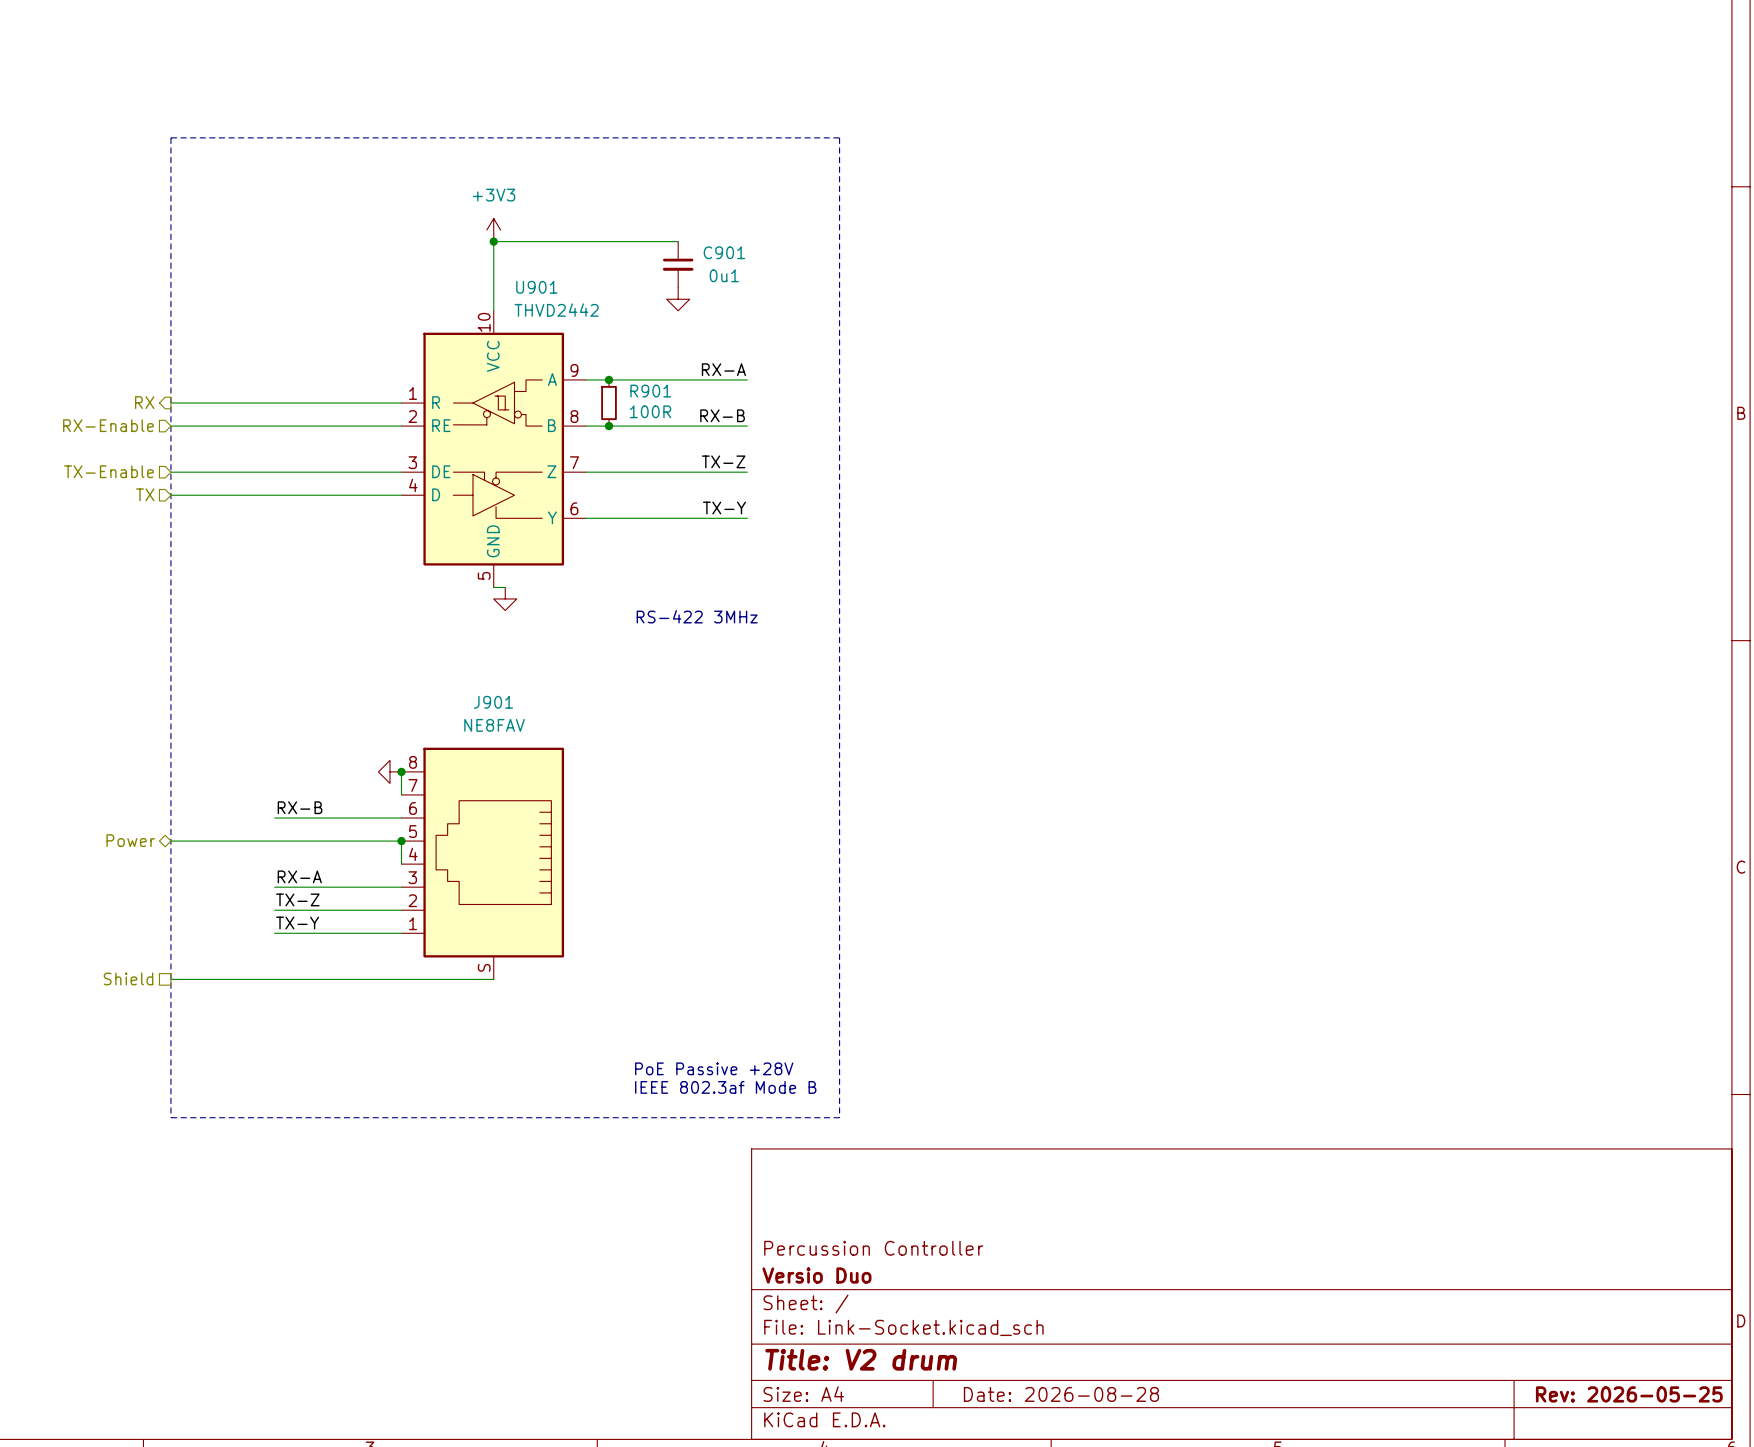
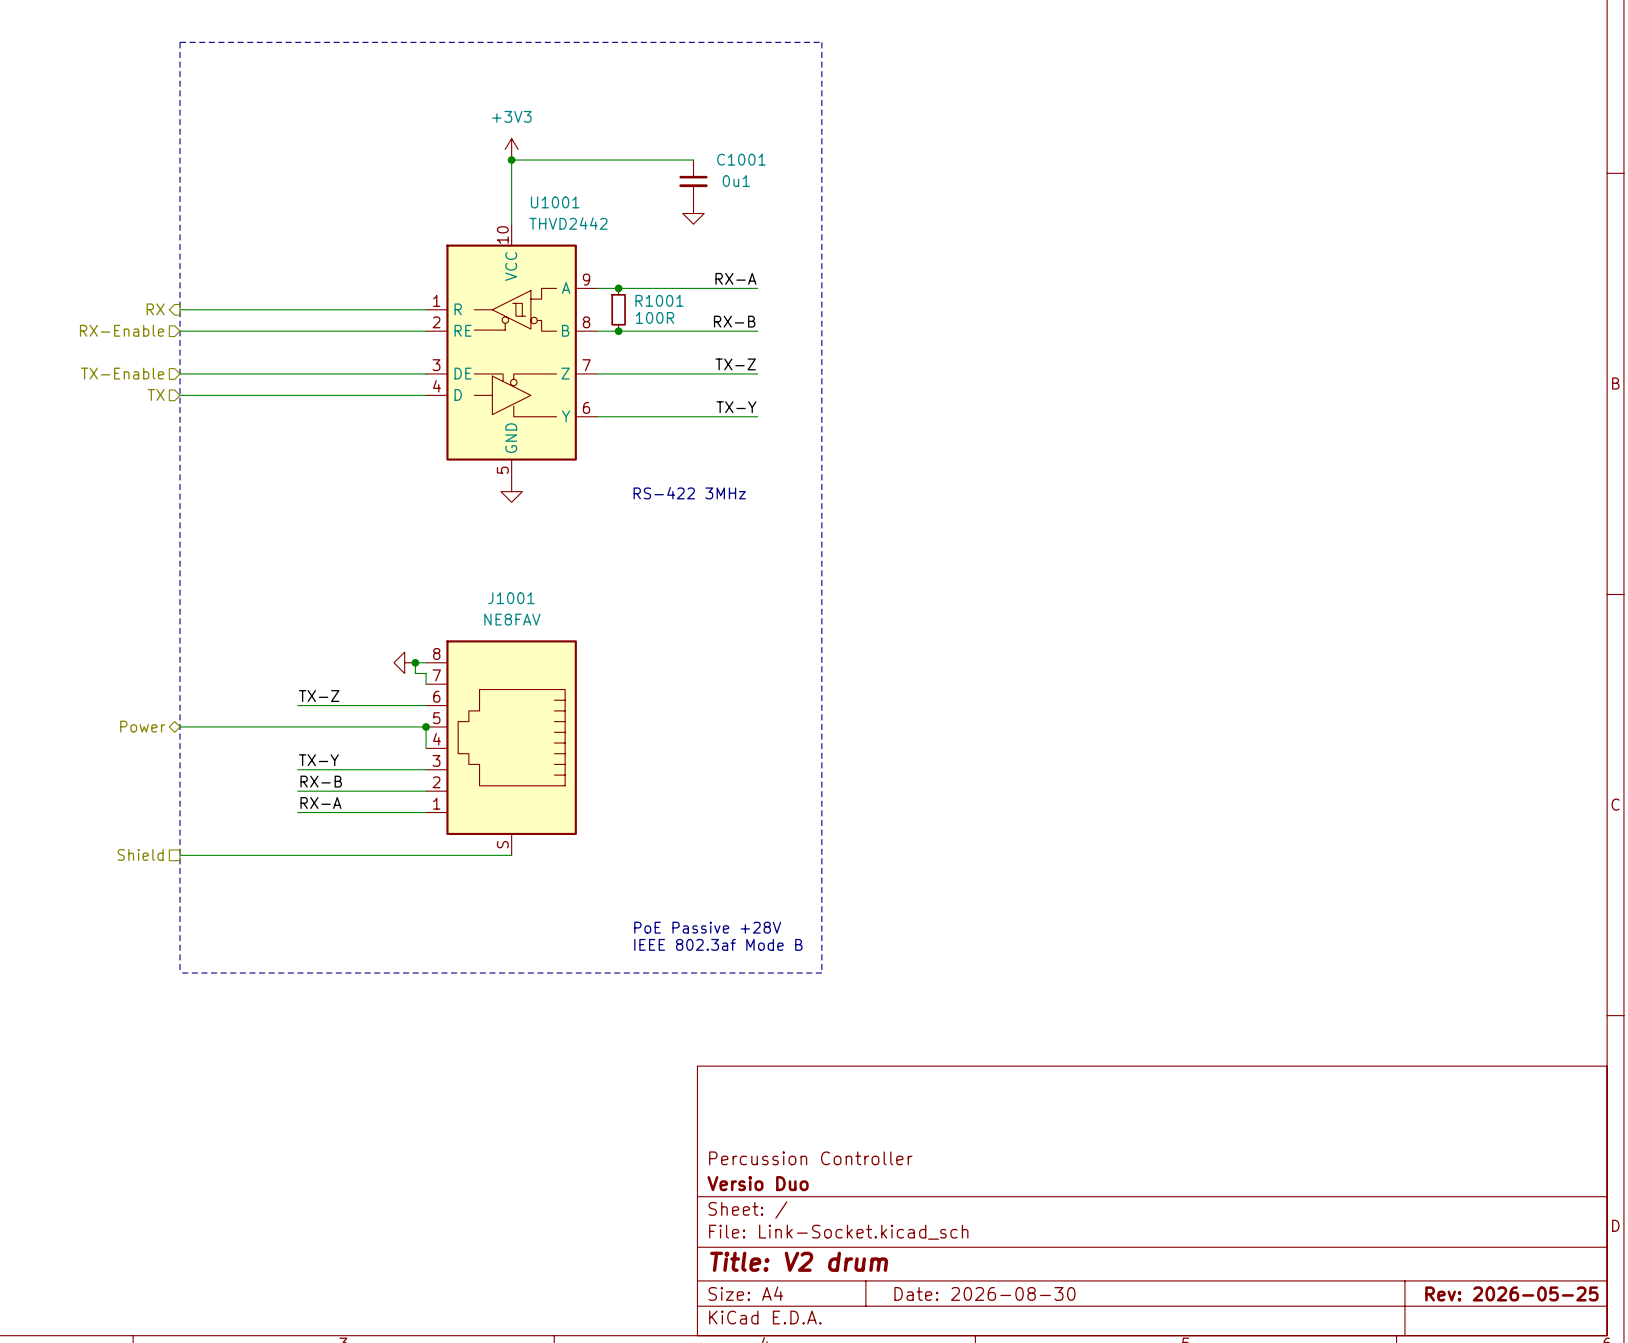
line: (170, 137) (170, 1117) (839, 1117) (839, 137) (170, 137) -> (180, 42) (180, 973) (821, 973) (821, 42) (180, 42)
junction: none -> (511, 160)
wire: none -> (693, 160) (511, 160) (511, 224)
C1001: none -> 0u1 (693, 181)
power symbol position: +3V3 (493, 230) -> +3V3 (511, 149)
junction: (493, 241) -> none
wire: (678, 241) (493, 241) (493, 310) -> none
C901: 0u1 (678, 264) -> none
power symbol position: (678, 299) -> (693, 213)
wire: none -> (597, 288) (757, 288)
junction: none -> (618, 288)
wire: none -> (180, 309) (426, 309)
R1001: none -> 100R (618, 309)
wire: none -> (180, 331) (426, 331)
wire: none -> (597, 331) (757, 331)
junction: none -> (618, 331)
label position: RX-A (723, 369) -> RX-A (735, 278)
U1001: none -> THVD2442 (511, 352)
wire: (585, 379) (747, 379) -> none
junction: (609, 379) -> none
hierarchical label position: RX (144, 402) -> RX (155, 309)
wire: (170, 403) (194, 403) -> none
R901: 100R (609, 403) -> none
wire: none -> (597, 373) (757, 373)
label position: RX-B (722, 415) -> RX-B (734, 321)
hierarchical label position: RX-Enable (108, 425) -> RX-Enable (122, 330)
wire: (170, 426) (194, 426) -> none
wire: (585, 426) (747, 426) -> none
junction: (609, 426) -> none
U901: THVD2442 (493, 449) -> none
wire: none -> (597, 416) (757, 416)
label position: TX-Z (723, 461) -> TX-Z (735, 364)
hierarchical label position: TX-Enable (109, 471) -> TX-Enable (122, 373)
wire: (170, 472) (401, 472) -> none
wire: (585, 472) (747, 472) -> none
hierarchical label position: TX (145, 494) -> TX (156, 394)
wire: (170, 495) (401, 495) -> none
label position: TX-Y (724, 508) -> TX-Y (736, 407)
wire: (585, 518) (747, 518) -> none
power symbol: none -> (511, 491)
wire: (493, 587) (505, 587) -> none
power symbol: (505, 598) -> none
text position: RS-422 3MHz (697, 616) -> RS-422 3MHz (689, 493)
power symbol: none -> (404, 662)
junction: none -> (415, 662)
wire: none -> (426, 662) (415, 662) (415, 673) (426, 673) (426, 684)
wire: none -> (297, 705) (426, 705)
power symbol: (389, 771) -> none
wire: (401, 771) (401, 794) -> none
junction: (401, 771) -> none
wire: none -> (180, 726) (426, 726) (426, 748)
junction: none -> (426, 726)
J1001: none -> NE8FAV (501, 747)
label position: RX-B (300, 807) -> RX-B (321, 781)
wire: (274, 818) (401, 818) -> none
wire: none -> (297, 769) (426, 769)
hierarchical label position: Power (130, 840) -> Power (142, 726)
wire: (170, 841) (401, 841) (401, 864) -> none
junction: (401, 841) -> none
wire: none -> (297, 791) (426, 791)
J901: NE8FAV (482, 863) -> none
wire: none -> (297, 812) (426, 812)
label position: RX-A (299, 876) -> RX-A (320, 803)
wire: (274, 887) (401, 887) -> none
label position: TX-Z (297, 899) -> TX-Z (319, 696)
wire: (274, 910) (401, 910) -> none
wire: none -> (180, 855) (511, 855)
label position: TX-Y (297, 923) -> TX-Y (318, 760)
wire: (274, 933) (401, 933) -> none
hierarchical label position: Shield (128, 978) -> Shield (140, 854)
wire: (170, 979) (493, 979) -> none
text position: PoE Passive +28V (714, 1068) -> PoE Passive +28V (707, 927)
text position: IEEE 802.3af Mode B (725, 1087) -> IEEE 802.3af Mode B (718, 944)
title block: Date: 2026-08-28 (1061, 1394) -> Date: 2026-08-30 (984, 1293)

